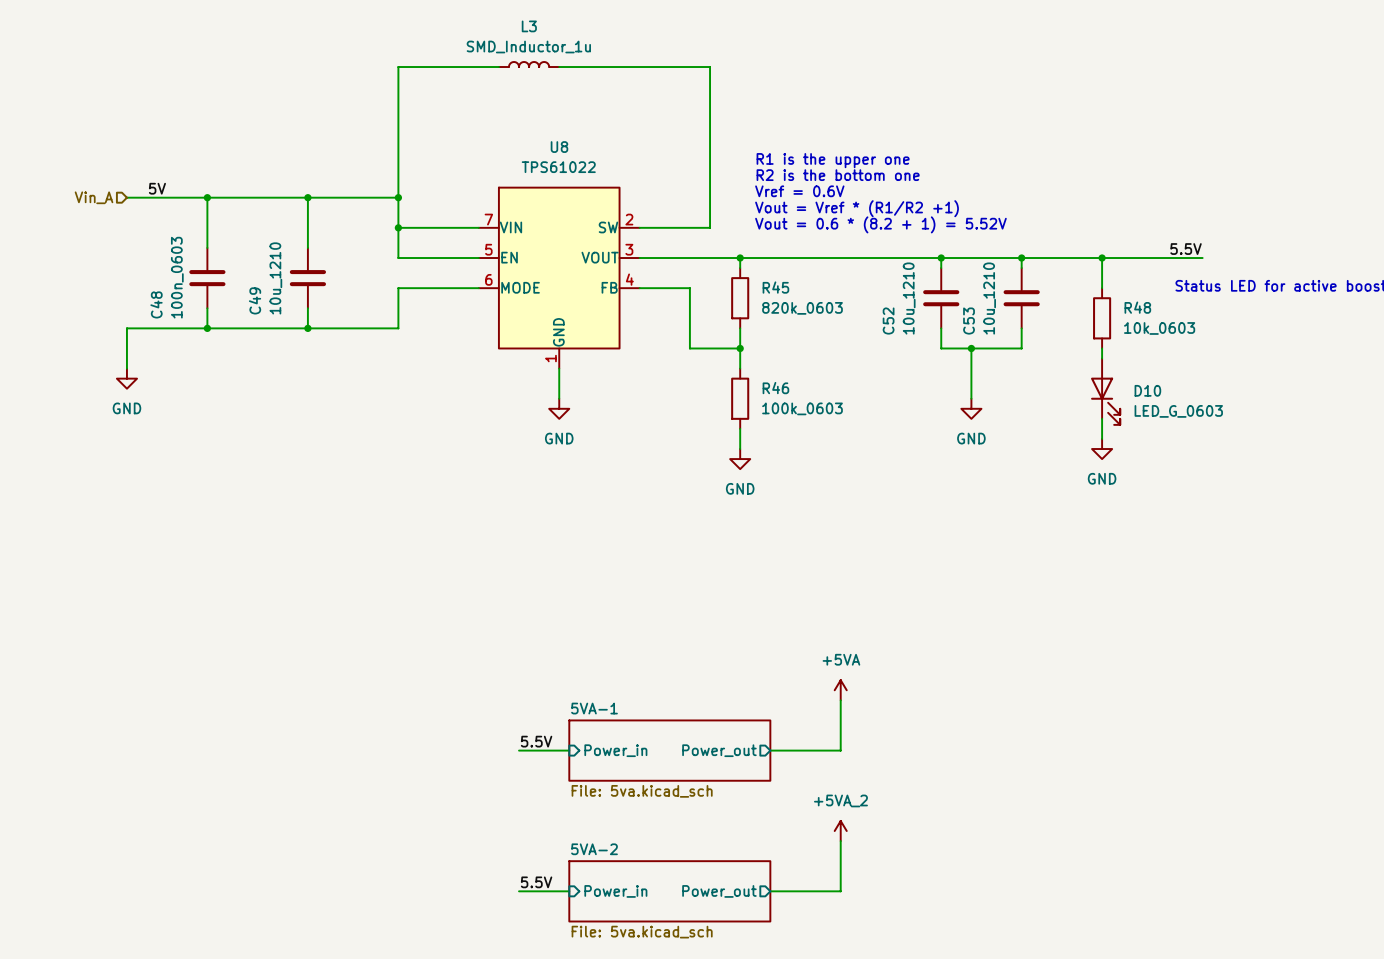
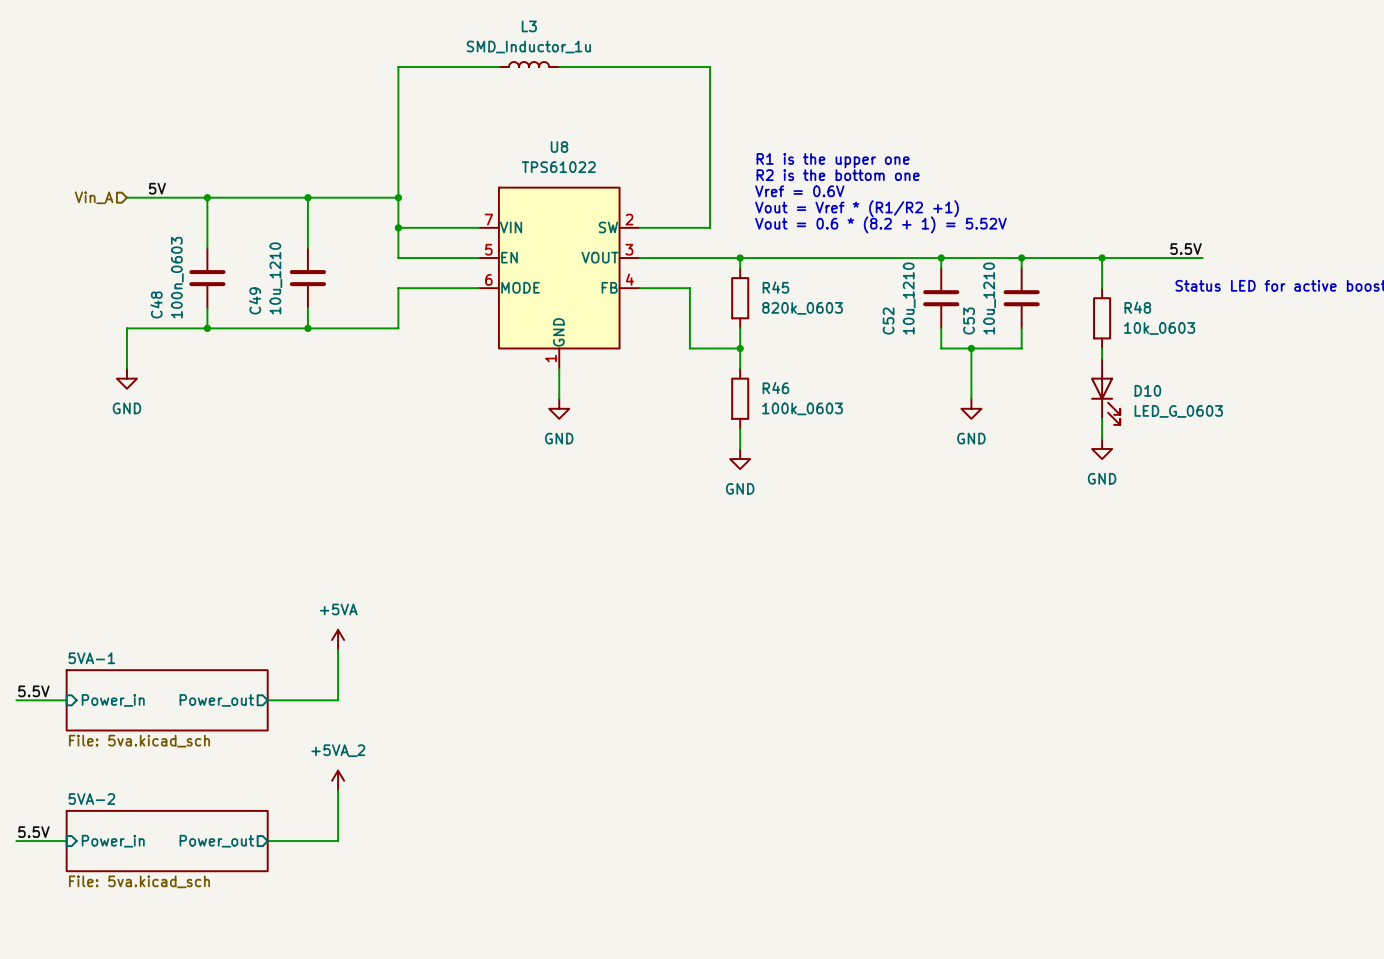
power symbol: none -> +5VA (338, 640)
wire: none -> (338, 650) (338, 700) (267, 700)
power symbol: +5VA (840, 690) -> none
label: none -> 5.5V (33, 691)
wire: none -> (16, 700) (66, 700)
sheet pin: none -> Power_in (113, 700)
sheet pin: none -> Power_out (216, 700)
wire: (840, 700) (840, 750) (770, 750) -> none
label: 5.5V (536, 741) -> none
wire: (519, 750) (569, 750) -> none
sheet pin: Power_in (615, 750) -> none
sheet 5VA-1 position: (669, 750) -> (167, 700)
sheet pin: Power_out (719, 750) -> none
power symbol: none -> +5VA_2 (338, 780)
wire: none -> (338, 790) (338, 841) (267, 841)
power symbol: +5VA_2 (840, 831) -> none
label: none -> 5.5V (33, 832)
wire: none -> (16, 841) (66, 841)
sheet pin: none -> Power_in (113, 841)
sheet pin: none -> Power_out (216, 841)
wire: (840, 841) (840, 891) (770, 891) -> none
label: 5.5V (536, 882) -> none
wire: (519, 891) (569, 891) -> none
sheet pin: Power_in (615, 891) -> none
sheet 5VA-2 position: (669, 891) -> (167, 841)
sheet pin: Power_out (719, 891) -> none

